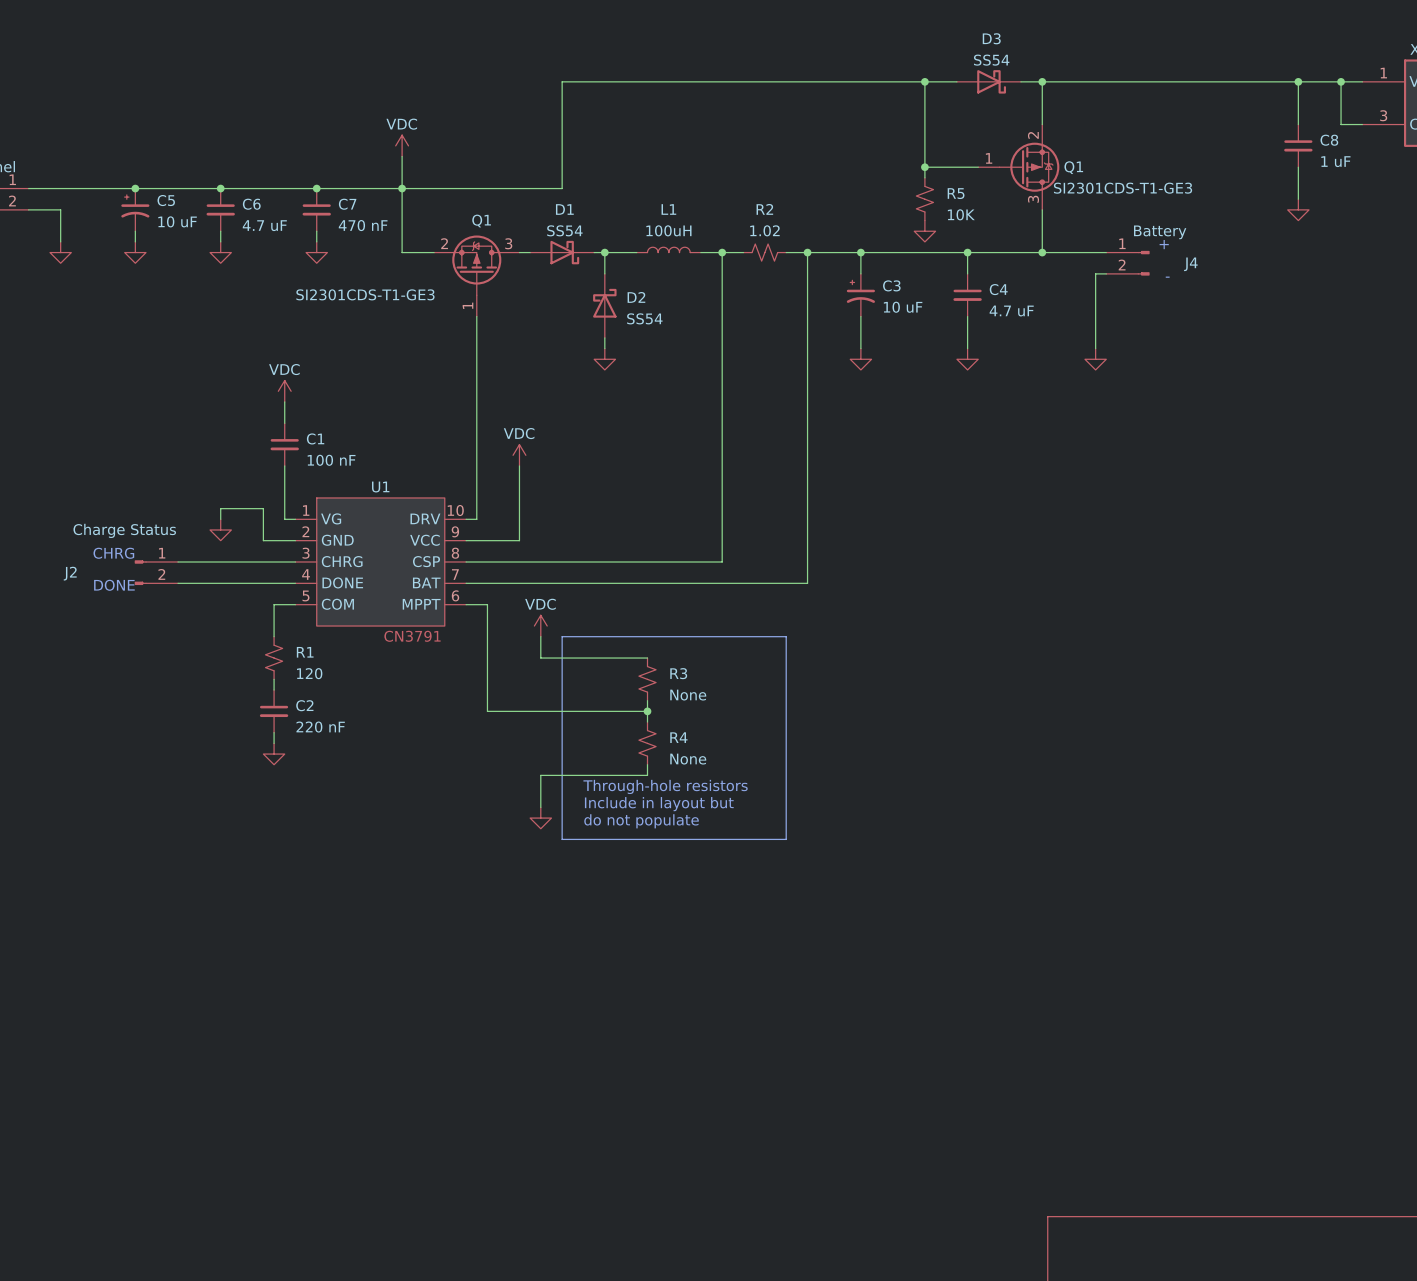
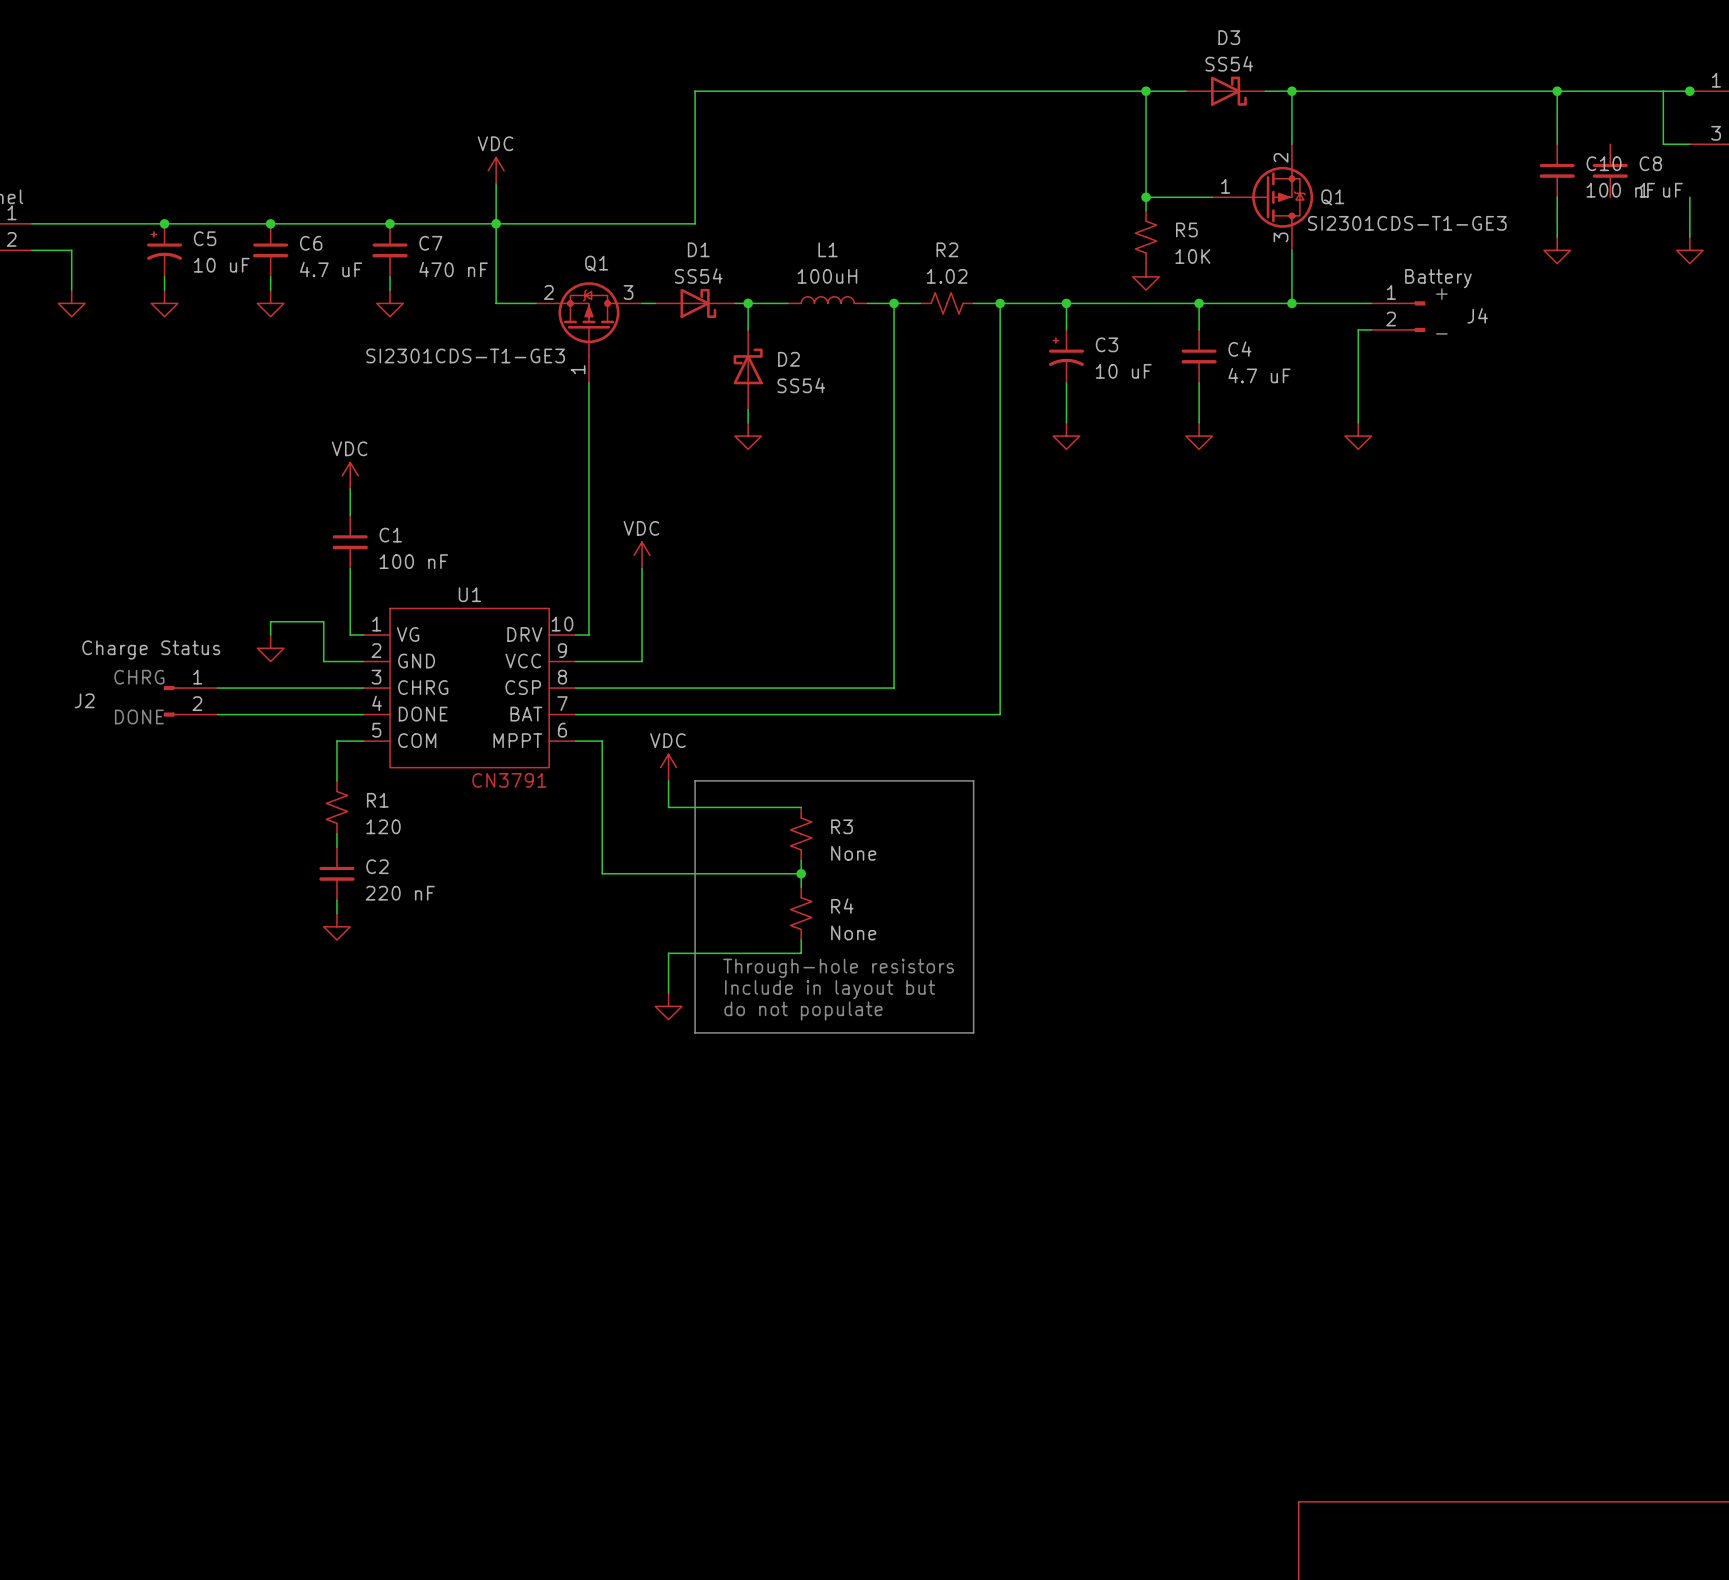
junction: none -> (1557, 91)
wire: (1298, 81) (1298, 124) -> (1557, 91) (1557, 144)
junction: (1298, 81) -> none
junction position: (1341, 81) -> (1689, 91)
C10: none -> 100 nF (1557, 170)
wire: (1298, 167) (1298, 199) -> (1557, 197) (1557, 237)
wire: none -> (1689, 197) (1689, 237)
power symbol: none -> (1557, 250)
power symbol: (1298, 209) -> none
power symbol: none -> (1689, 250)

